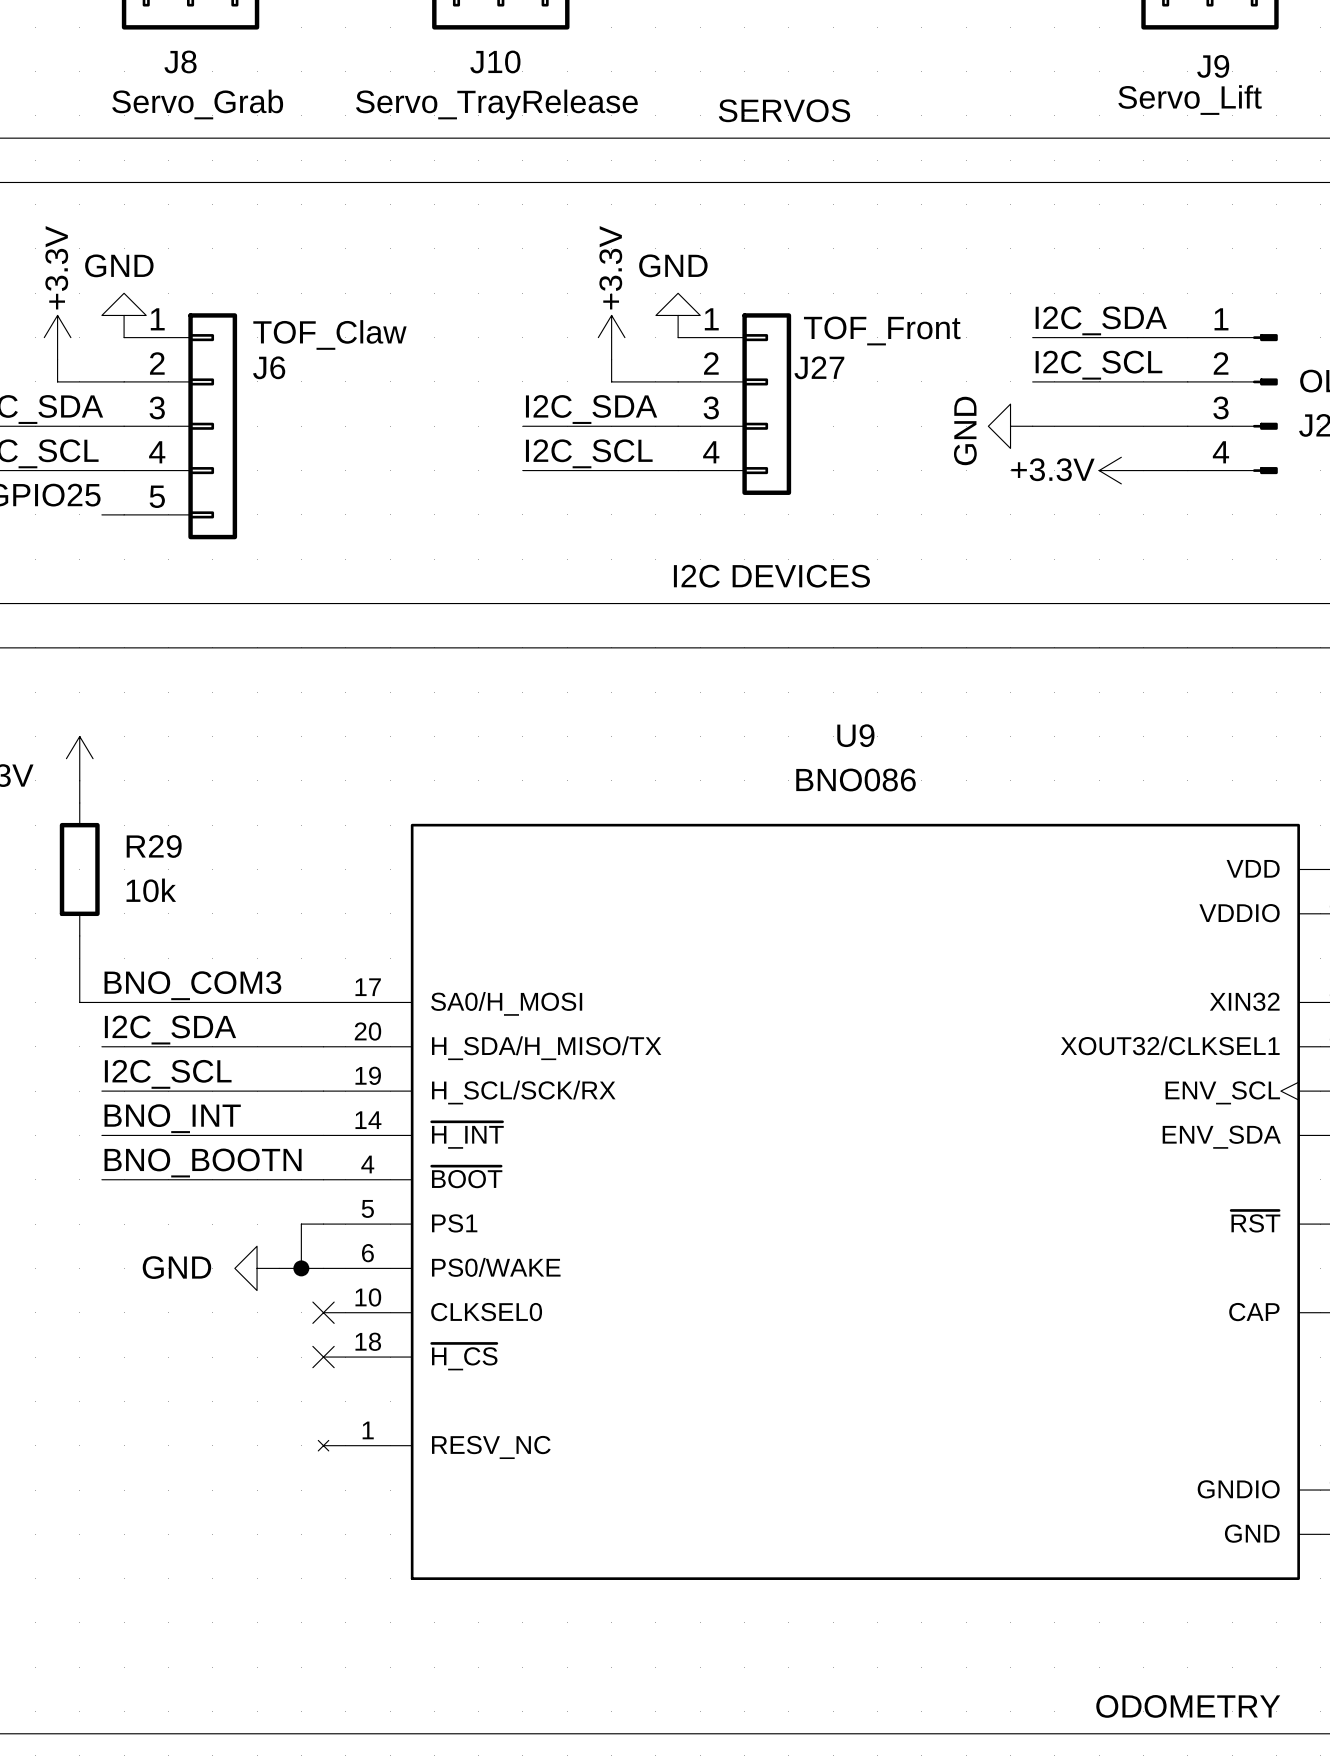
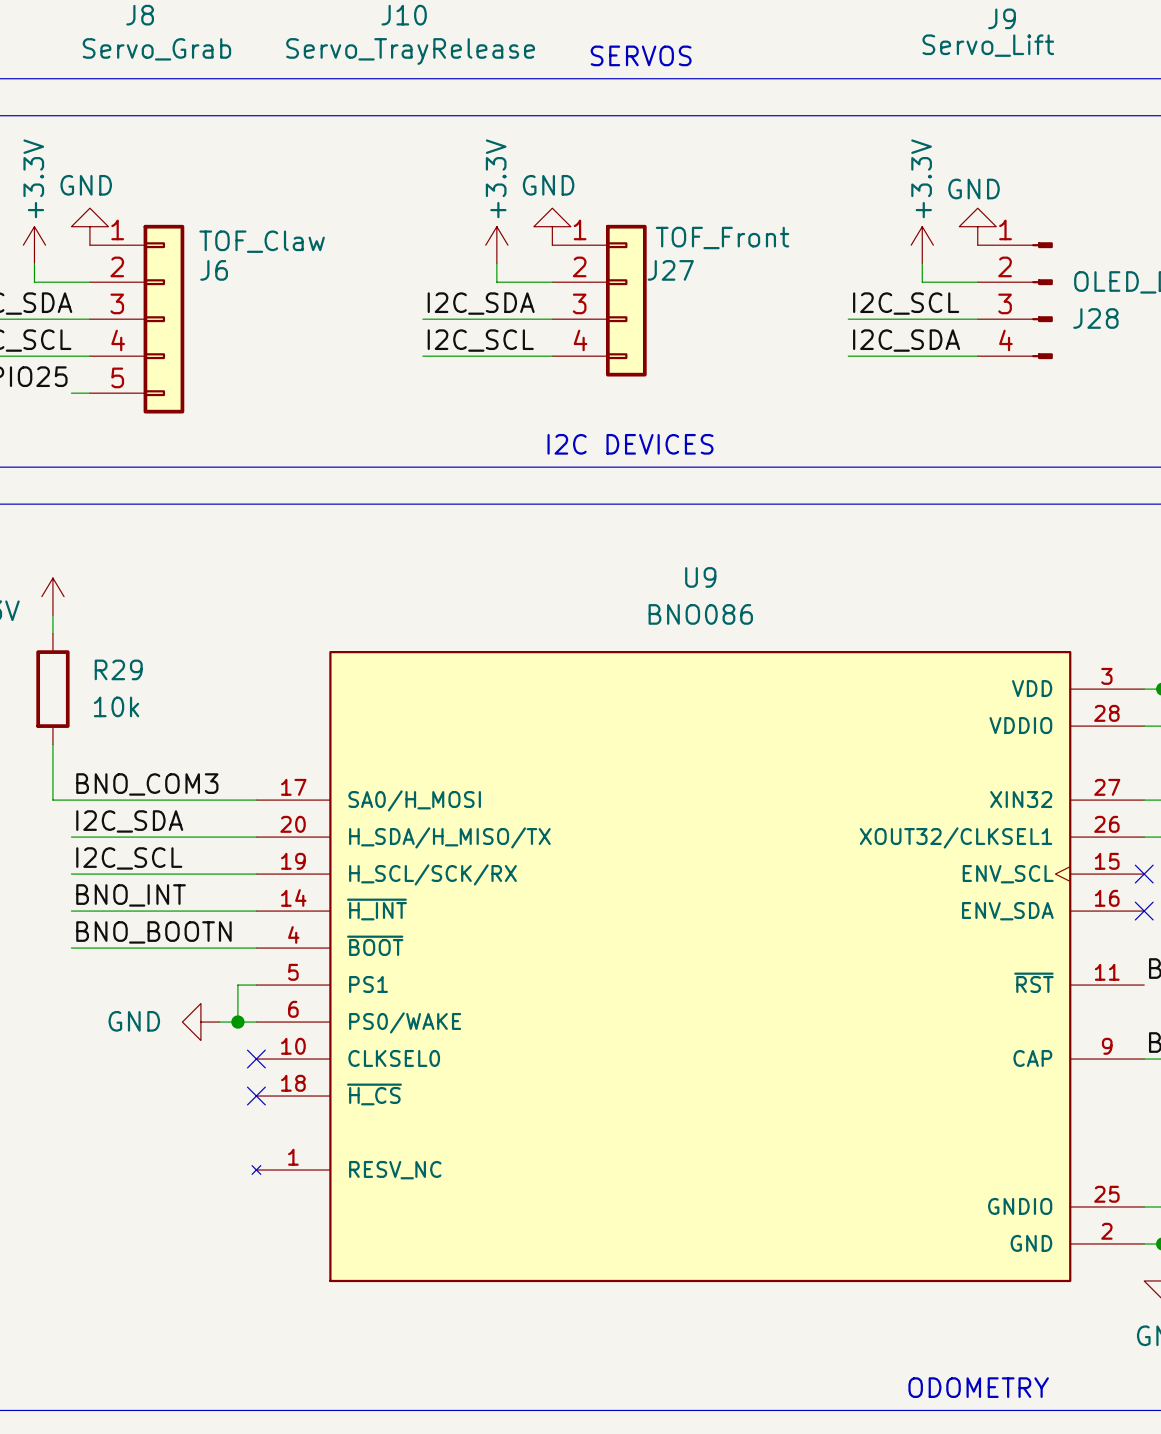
label position: I2C_SDA (1101, 320) -> I2C_SDA (906, 340)
wire: (1032, 337) (1187, 337) -> none
label position: I2C_SCL (1098, 365) -> I2C_SCL (906, 303)
wire: (1032, 381) (1121, 381) -> (922, 263) (922, 282)
power symbol rotation: 0° (1010, 426) -> 90° clockwise (977, 226)
power symbol position: GND (1010, 426) -> GND (977, 226)
wire: none -> (848, 356) (940, 356)
power symbol rotation: 0° (1121, 470) -> 90° clockwise (922, 245)
power symbol position: +3.3V (1121, 470) -> +3.3V (922, 245)

